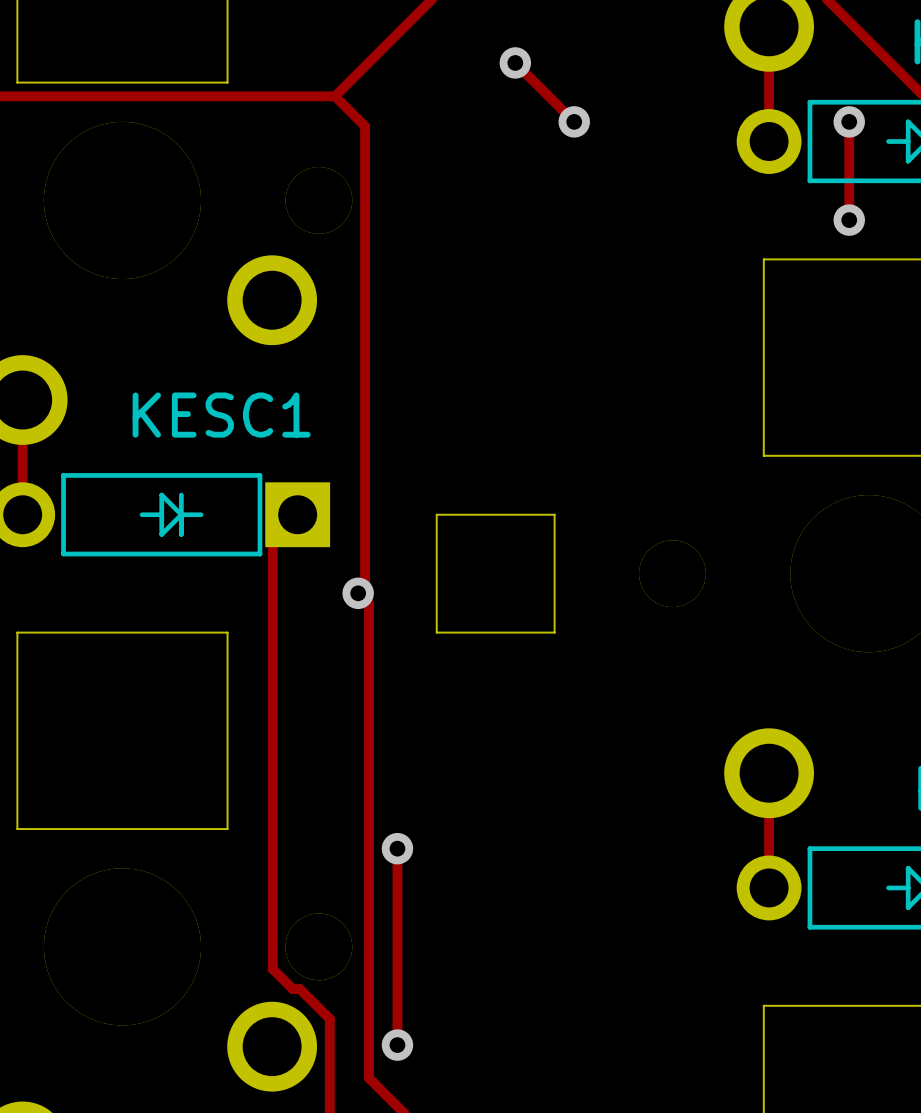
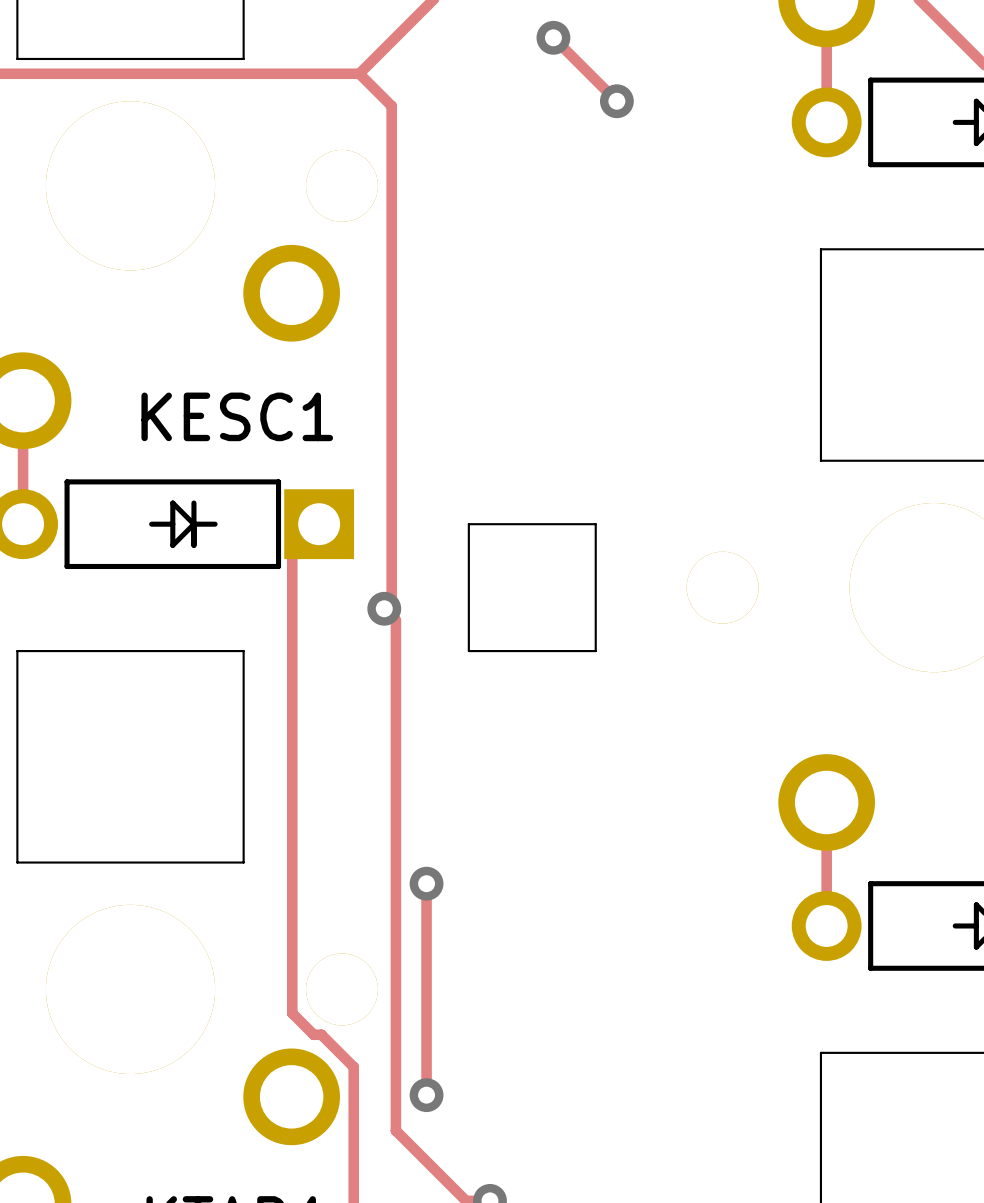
track: (849, 121) (849, 220) -> none
via: (849, 121) -> none
via: (849, 220) -> none

